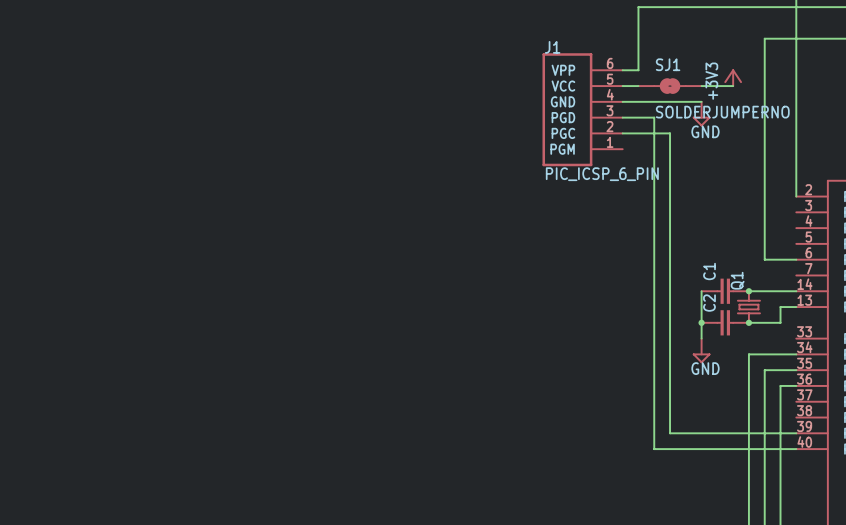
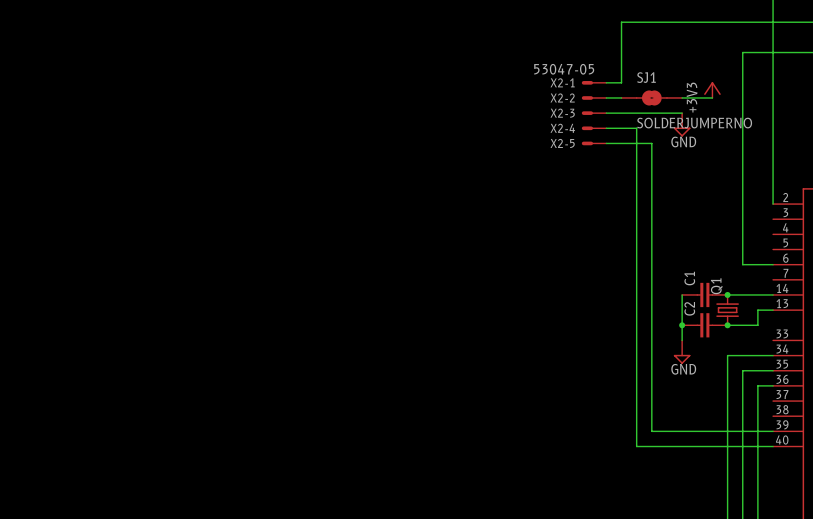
X2-1: none -> 53047-05 (594, 82)
X2-2: none -> (594, 97)
X2-3: none -> (594, 113)
J1: PIC_ICSP_6_PIN (582, 109) -> none
X2-4: none -> (594, 128)
X2-5: none -> (594, 143)

